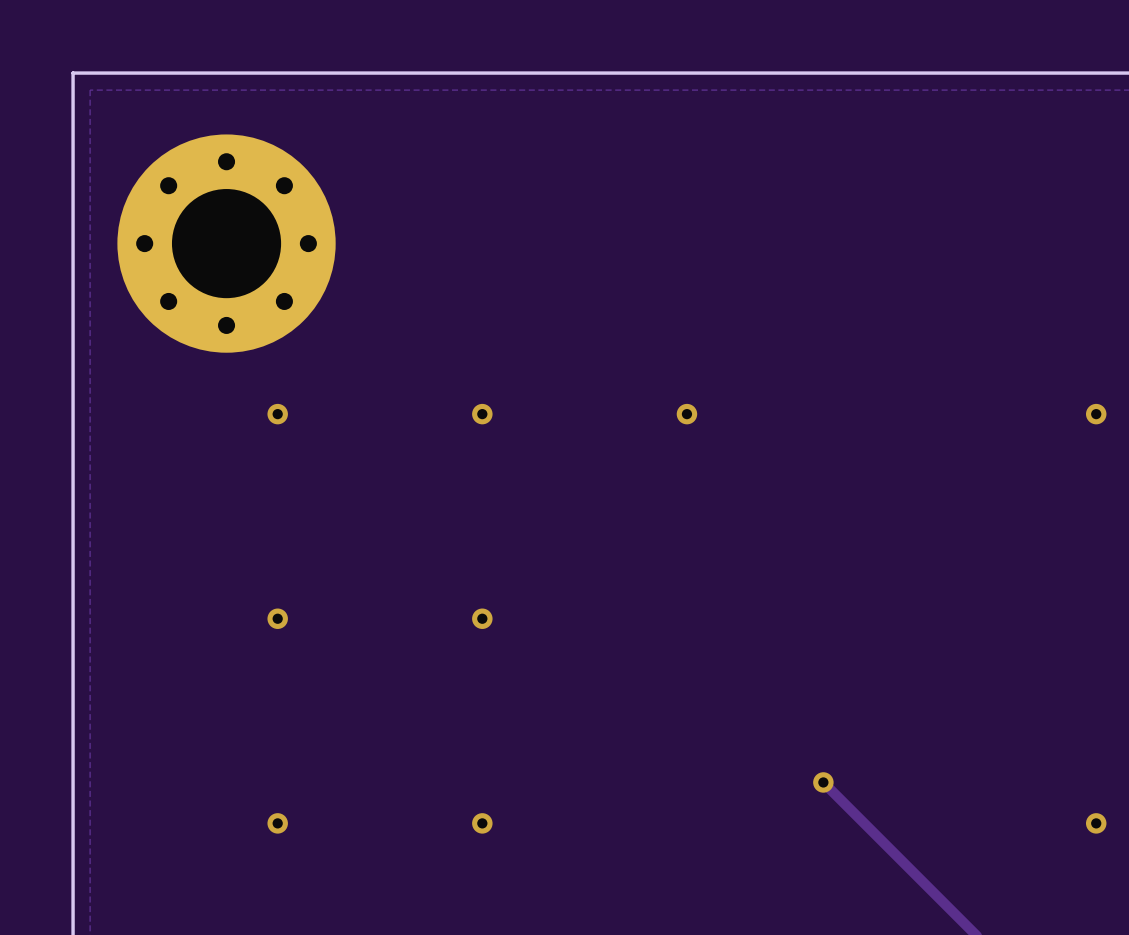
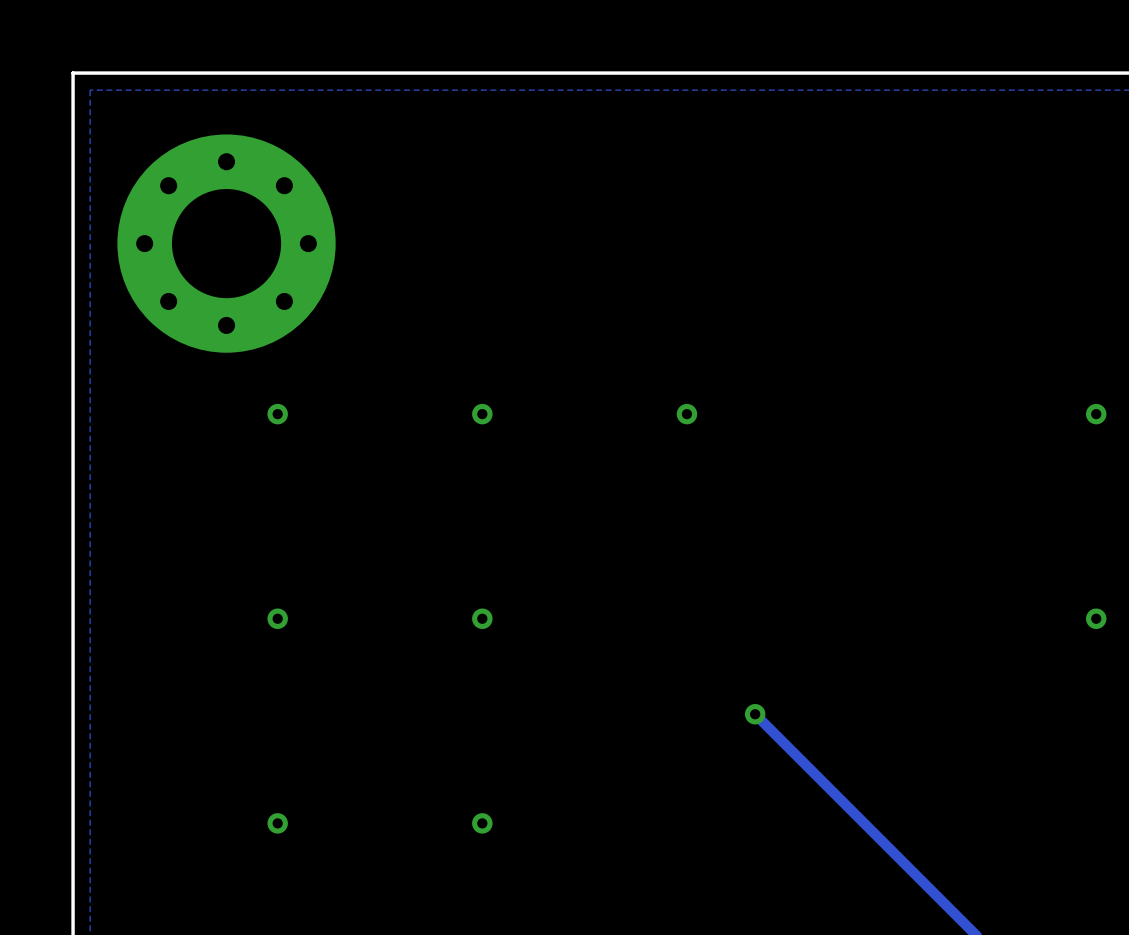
via: none -> (1096, 618)
track: none -> (755, 714) (823, 782)
via position: (823, 782) -> (755, 714)
via: (1096, 823) -> none

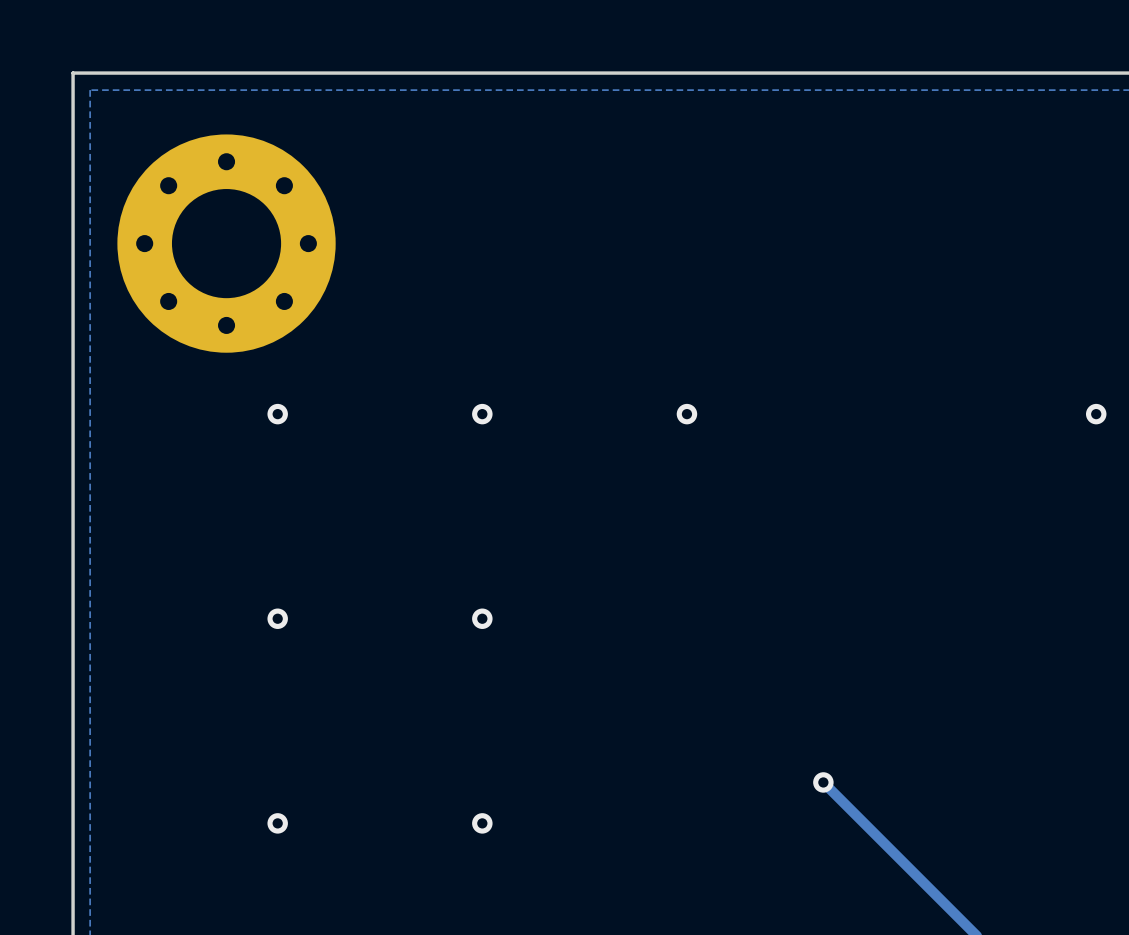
via: (1096, 618) -> none
track: (755, 714) (823, 782) -> none
via position: (755, 714) -> (823, 782)

